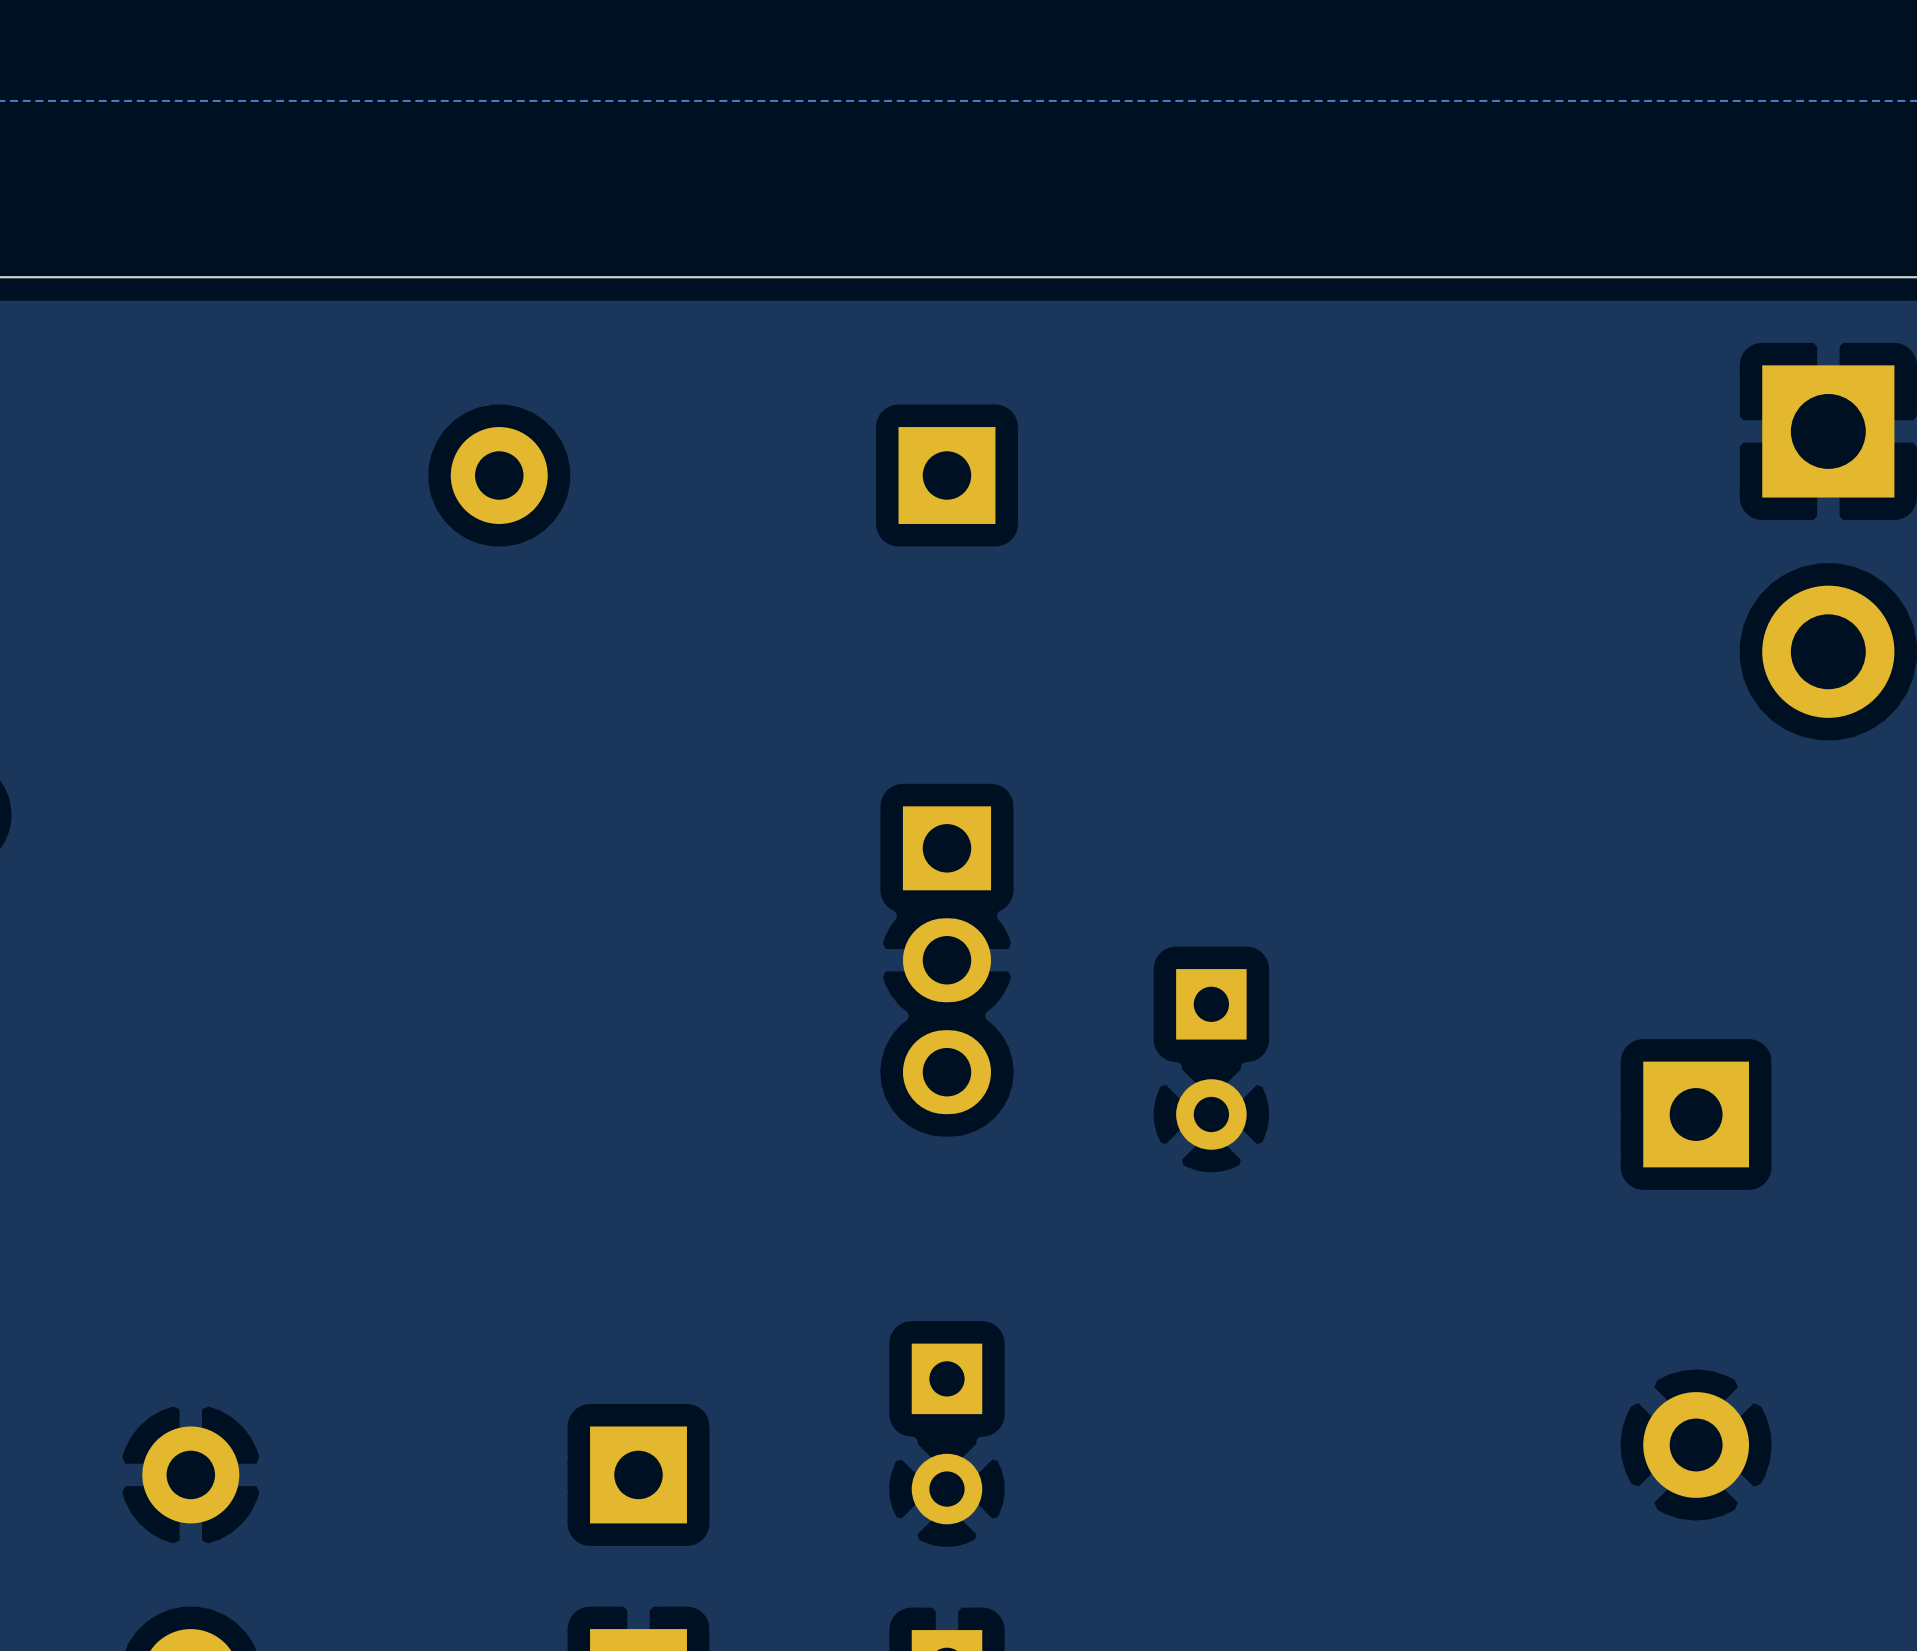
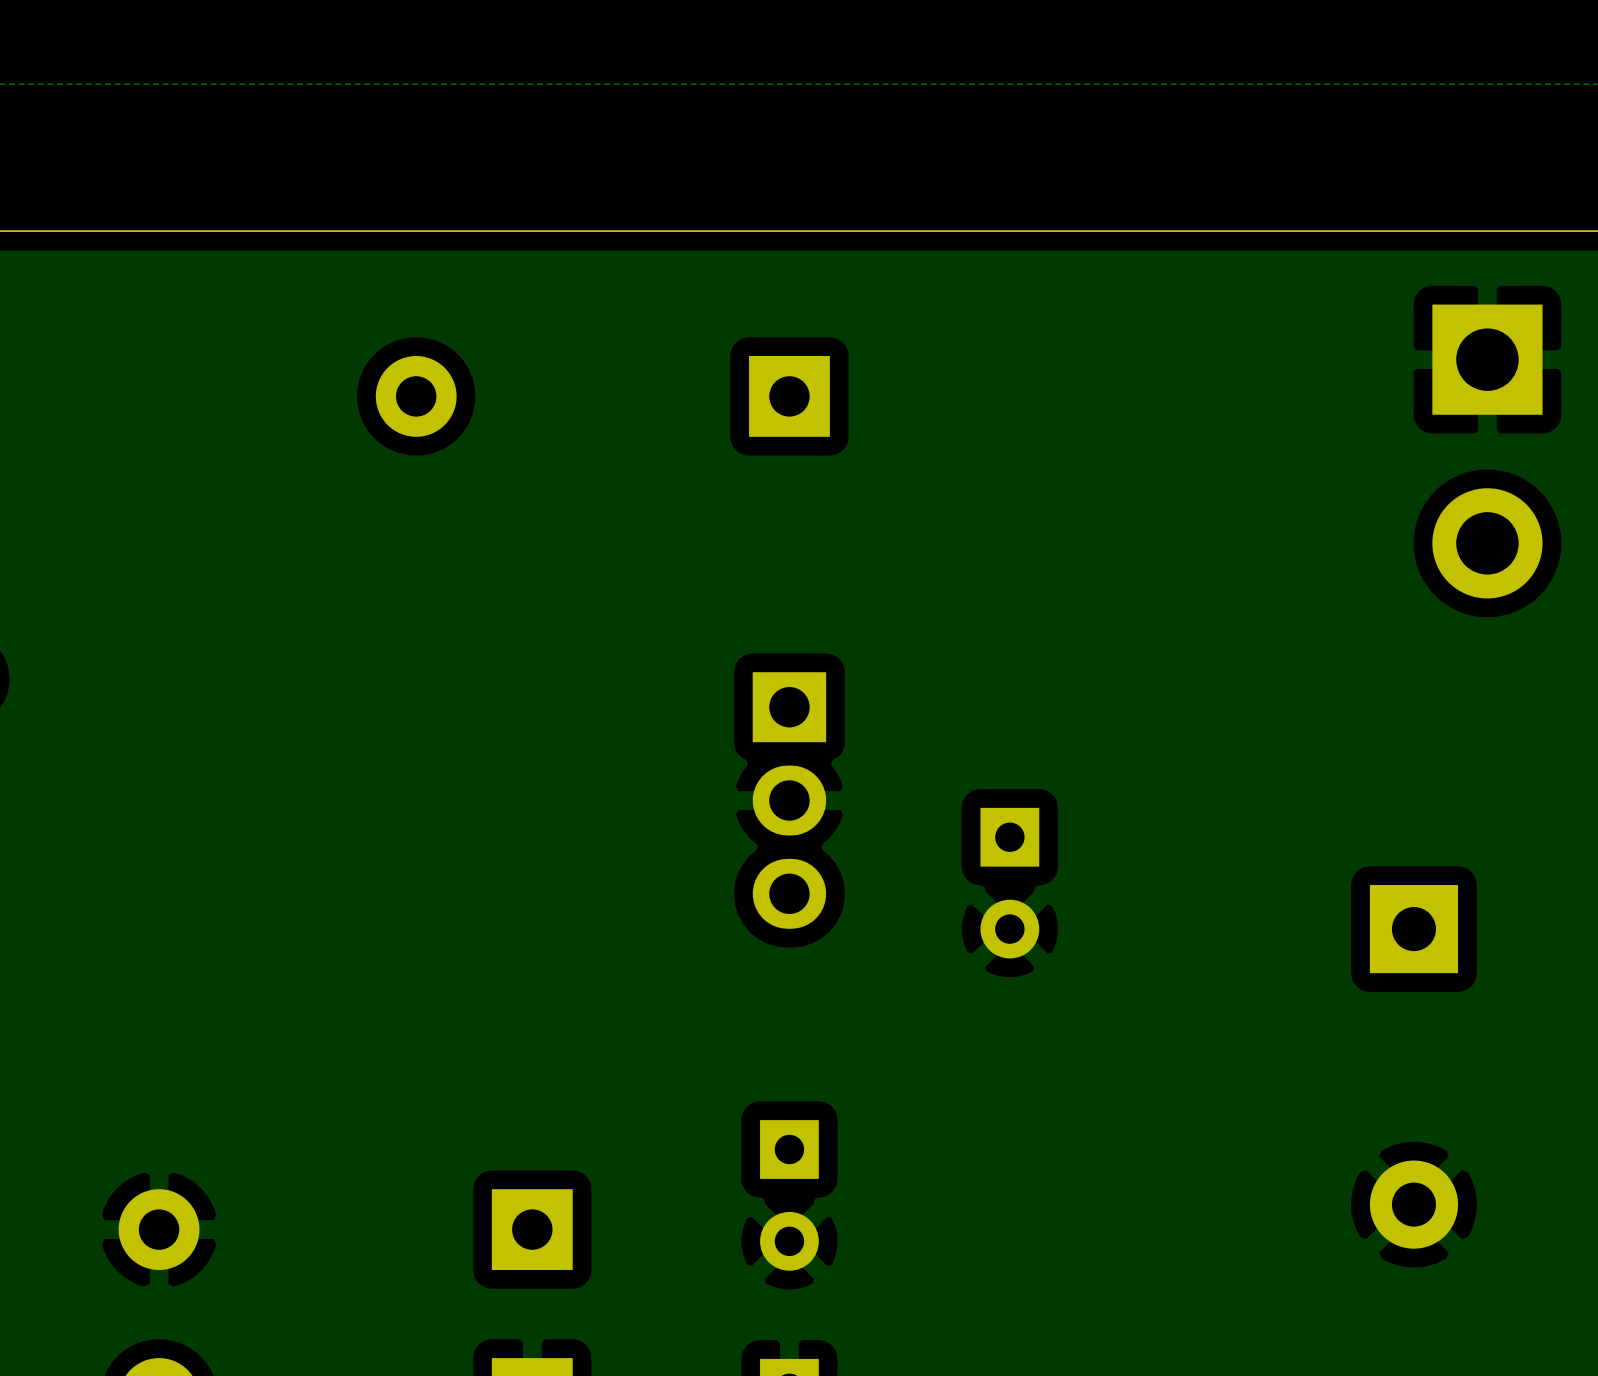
part position: (1828, 541) -> (1487, 451)

